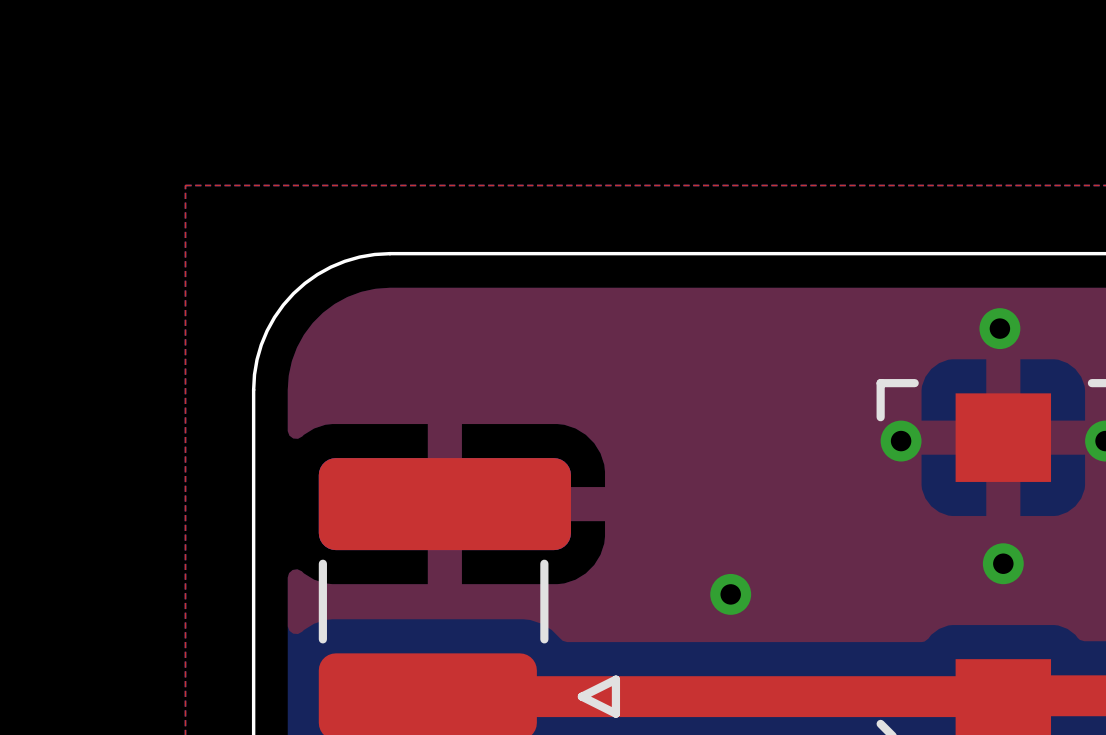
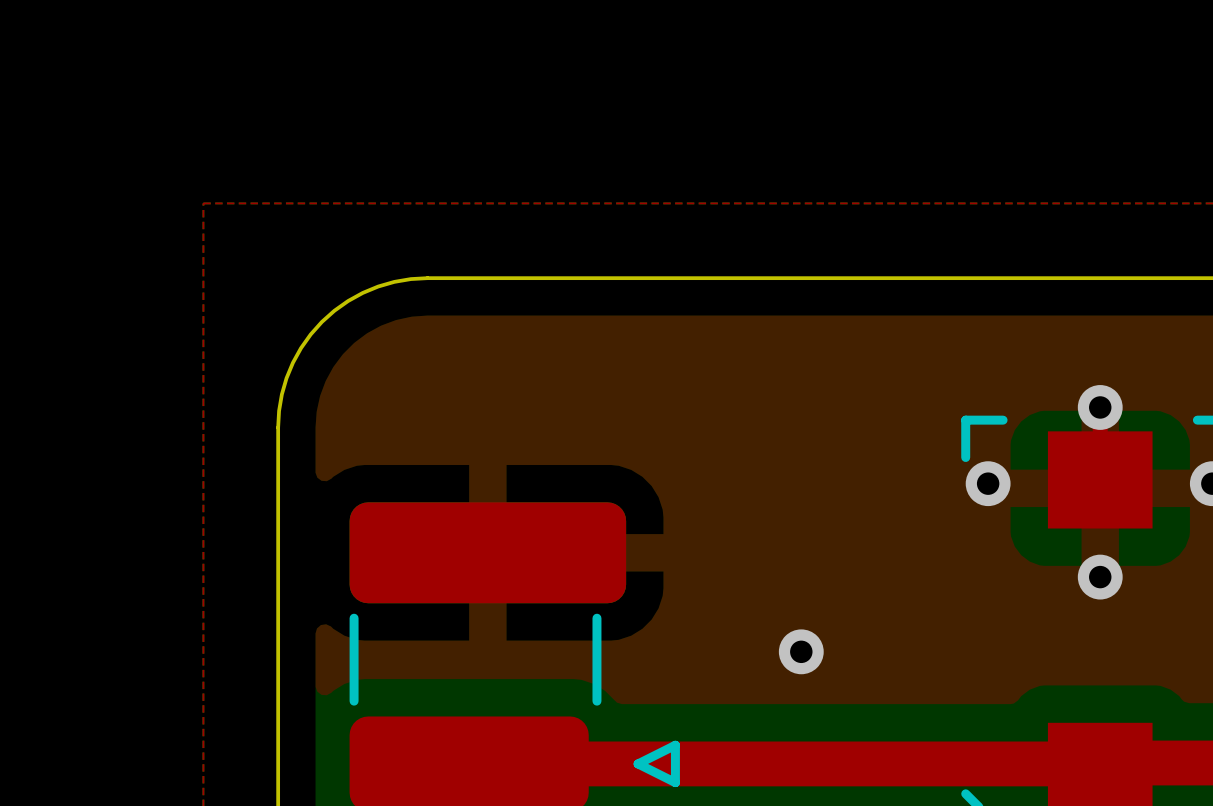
via position: (999, 328) -> (1100, 407)
via position: (1003, 563) -> (1100, 577)

